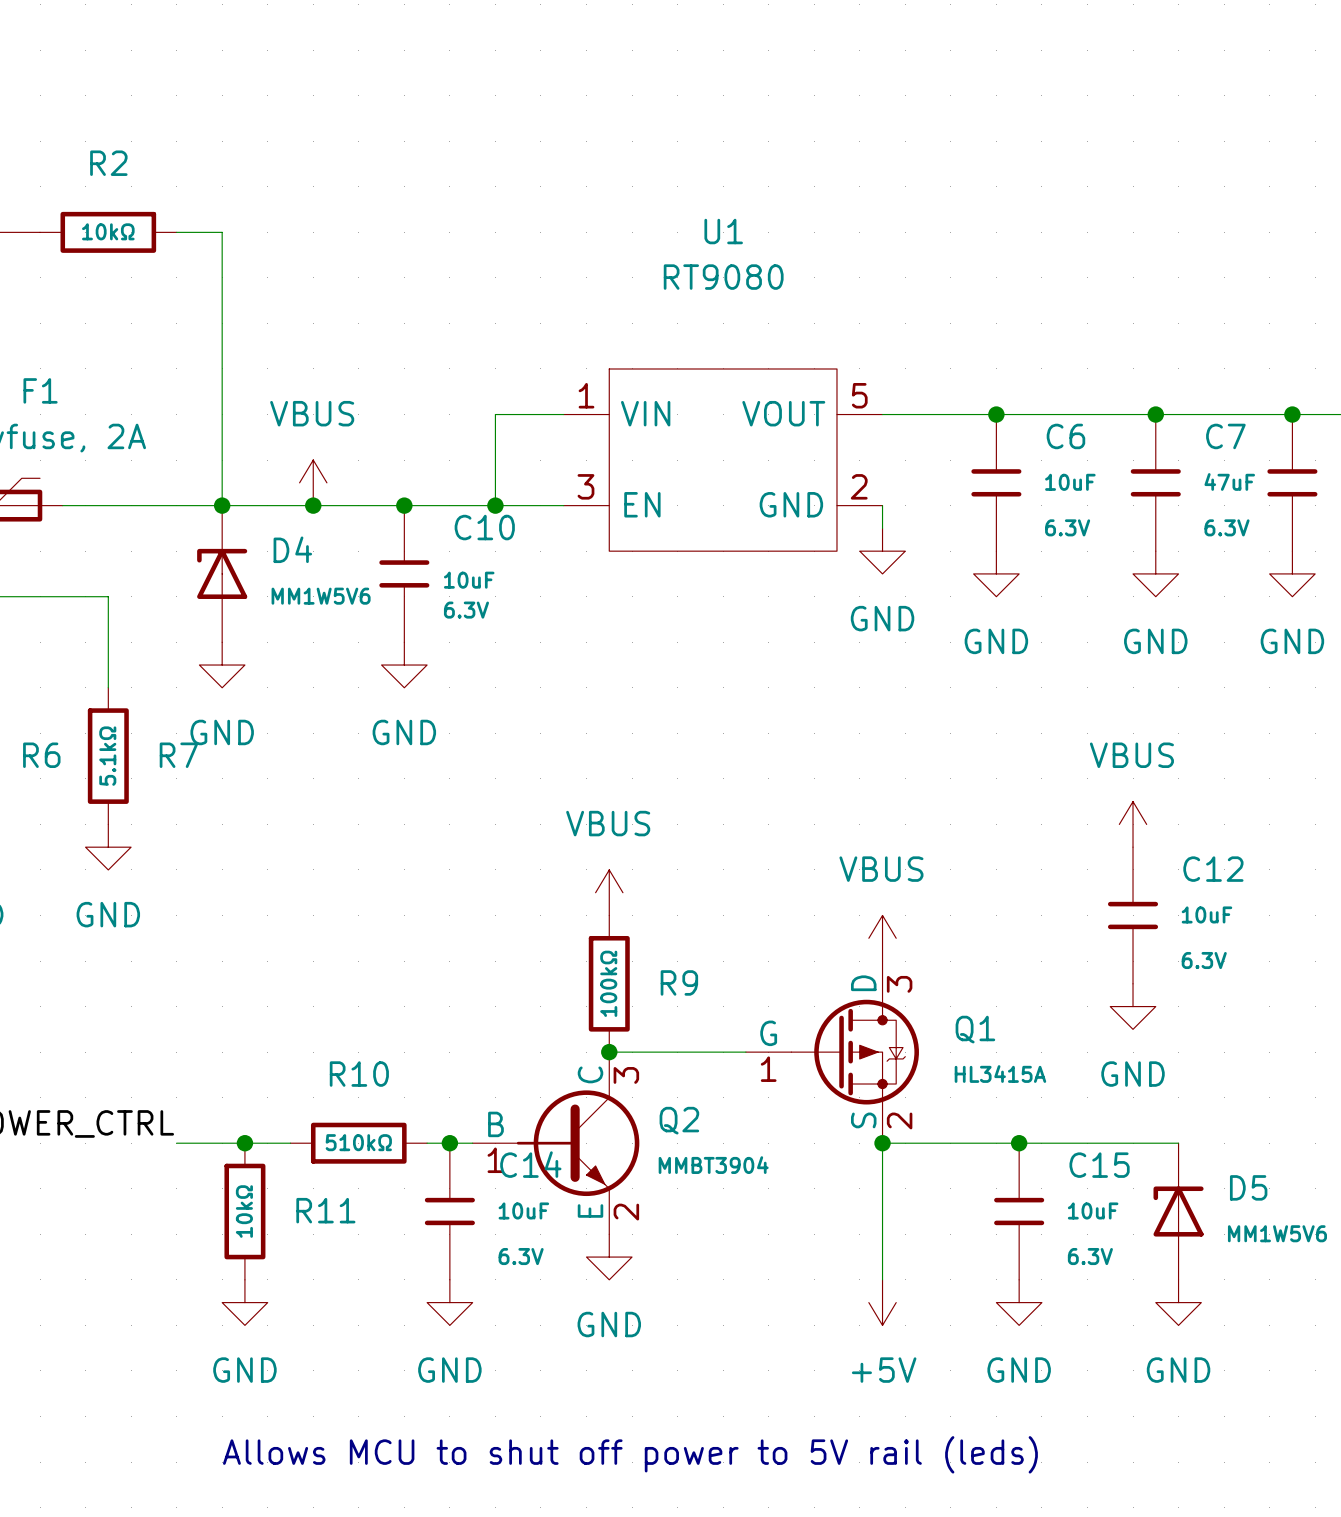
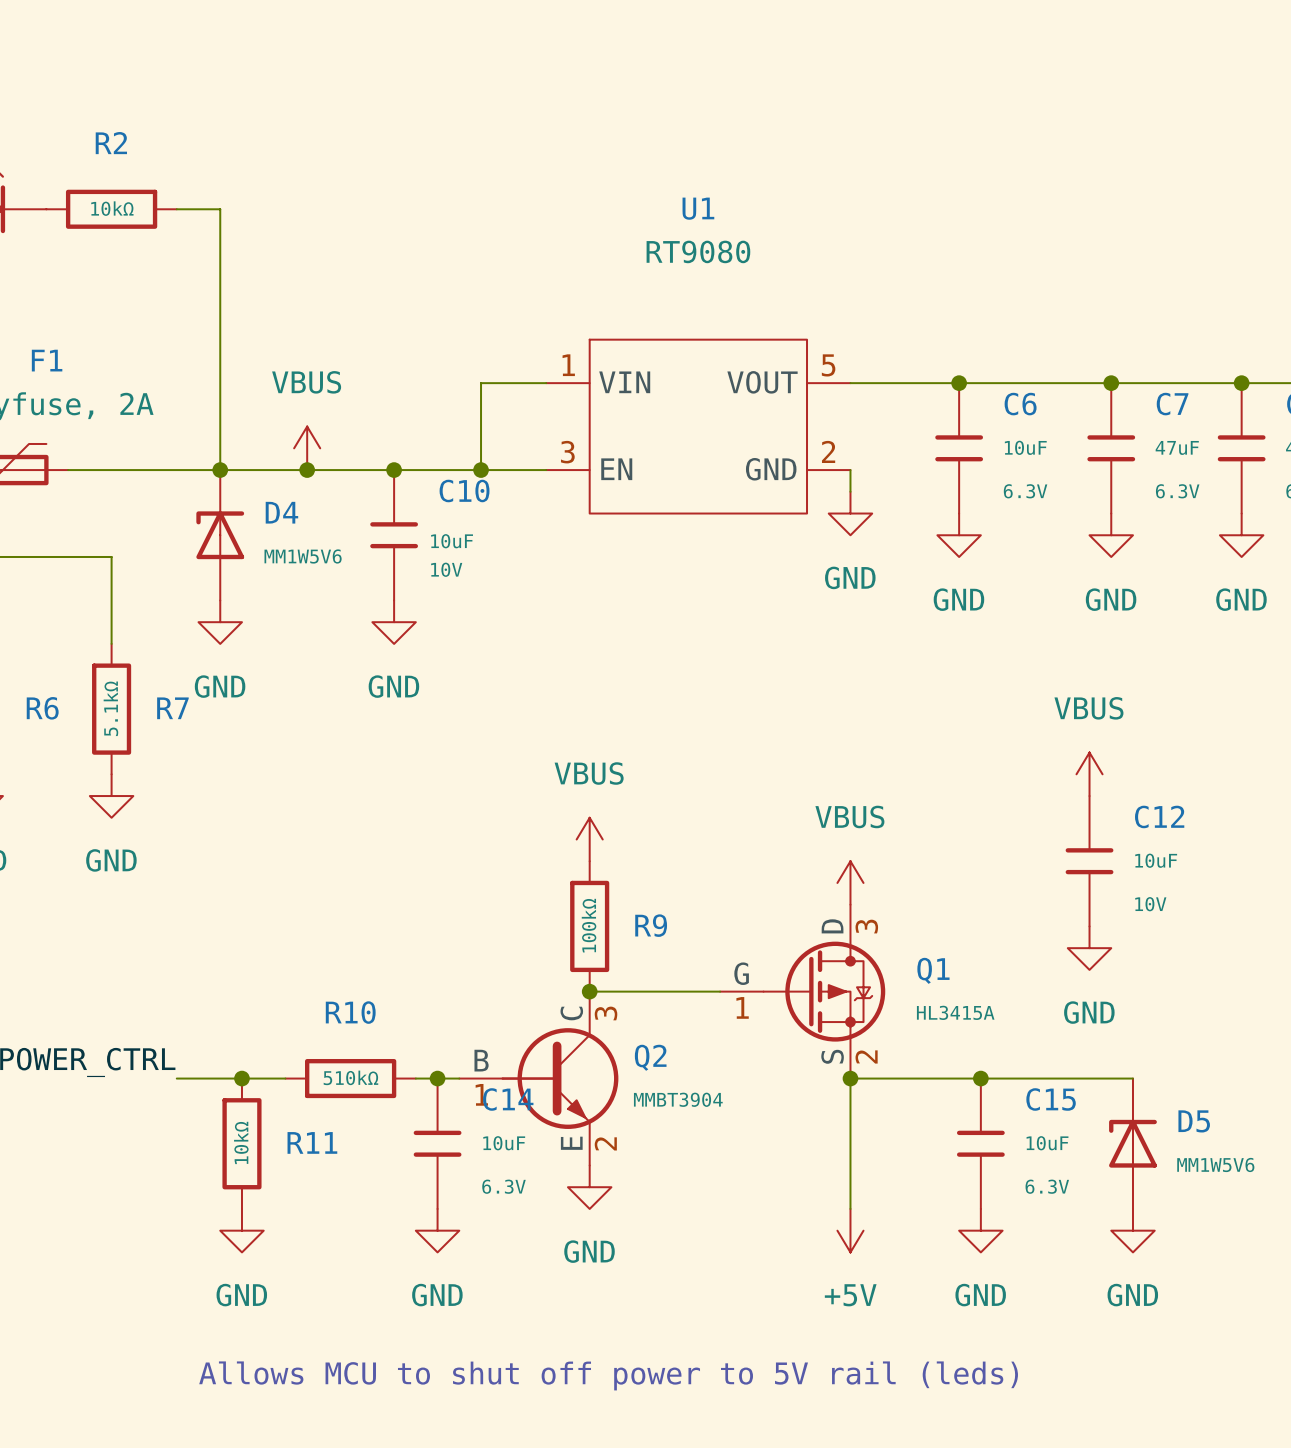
C10 text: 6.3V (466, 610) -> 10V (446, 569)
C12 text: 6.3V (1204, 960) -> 10V (1150, 904)

